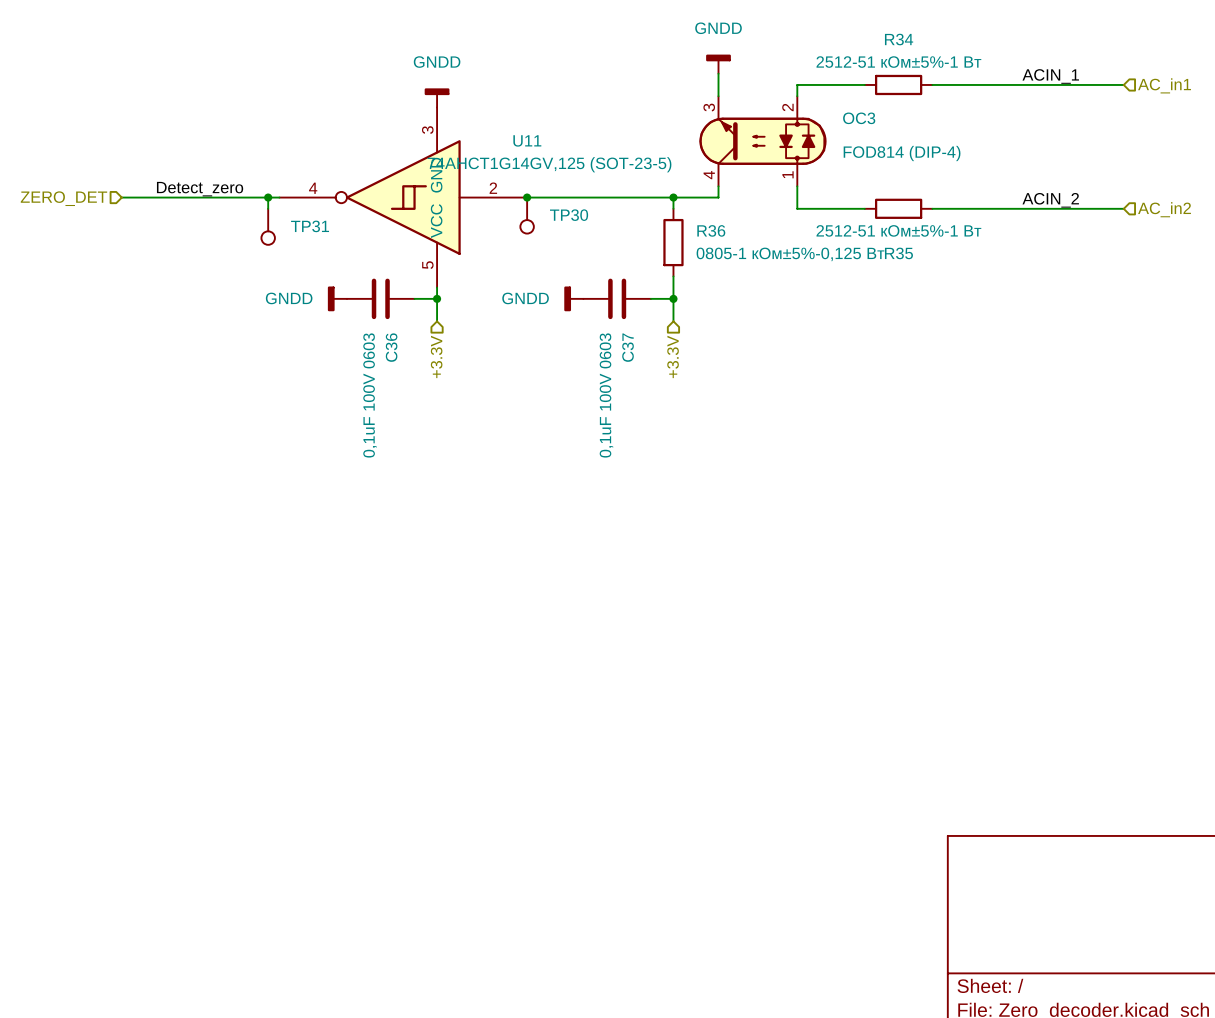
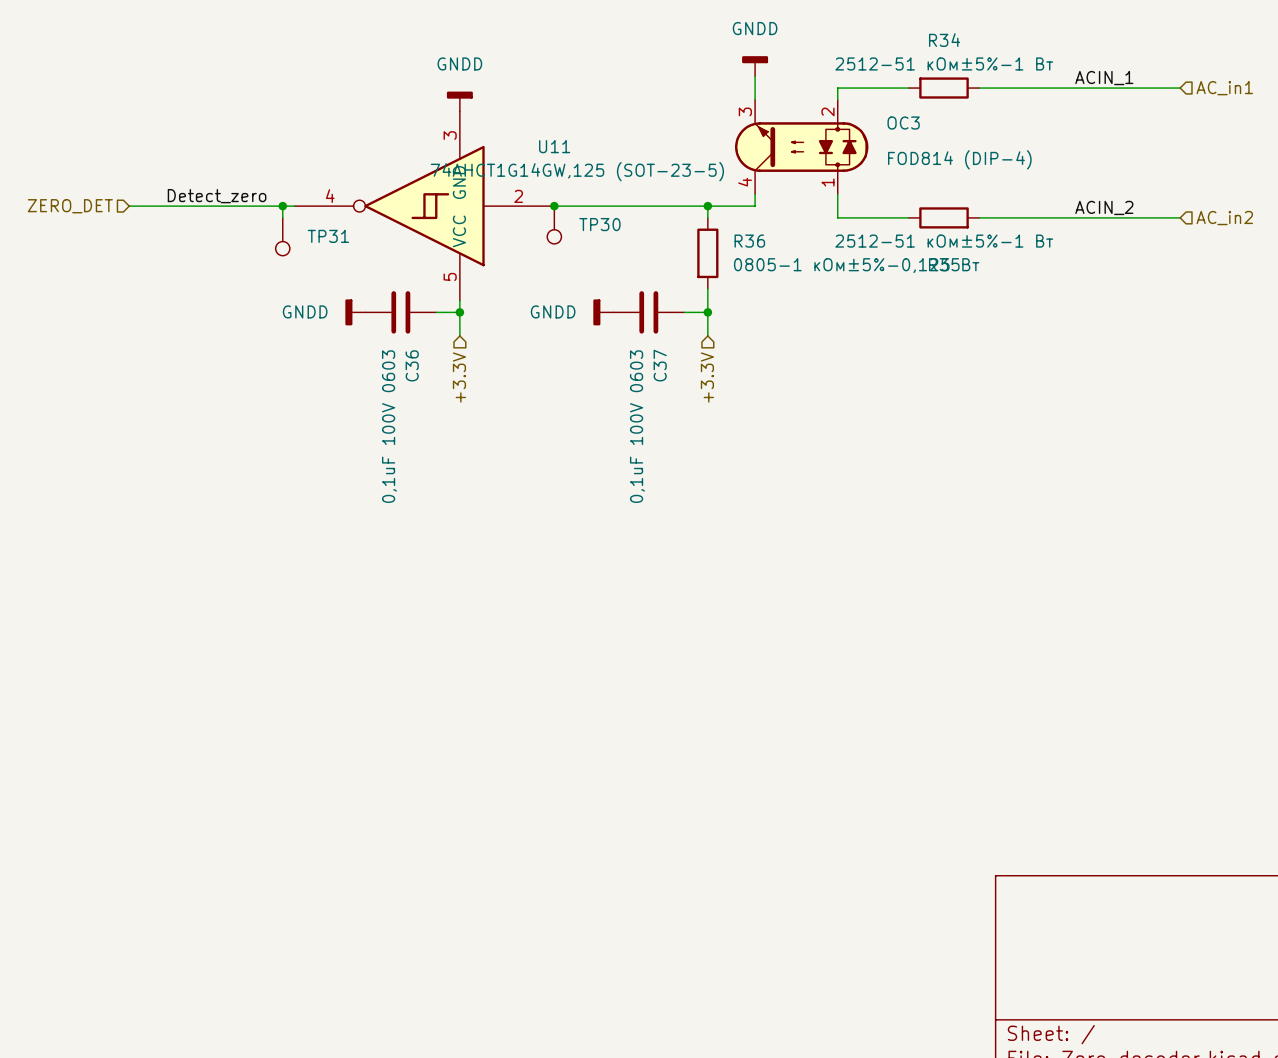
U11 value: 74AHCT1G14GV,125 (SOT-23-5) (549, 164) -> 74AHCT1G14GW,125 (SOT-23-5) (577, 171)

